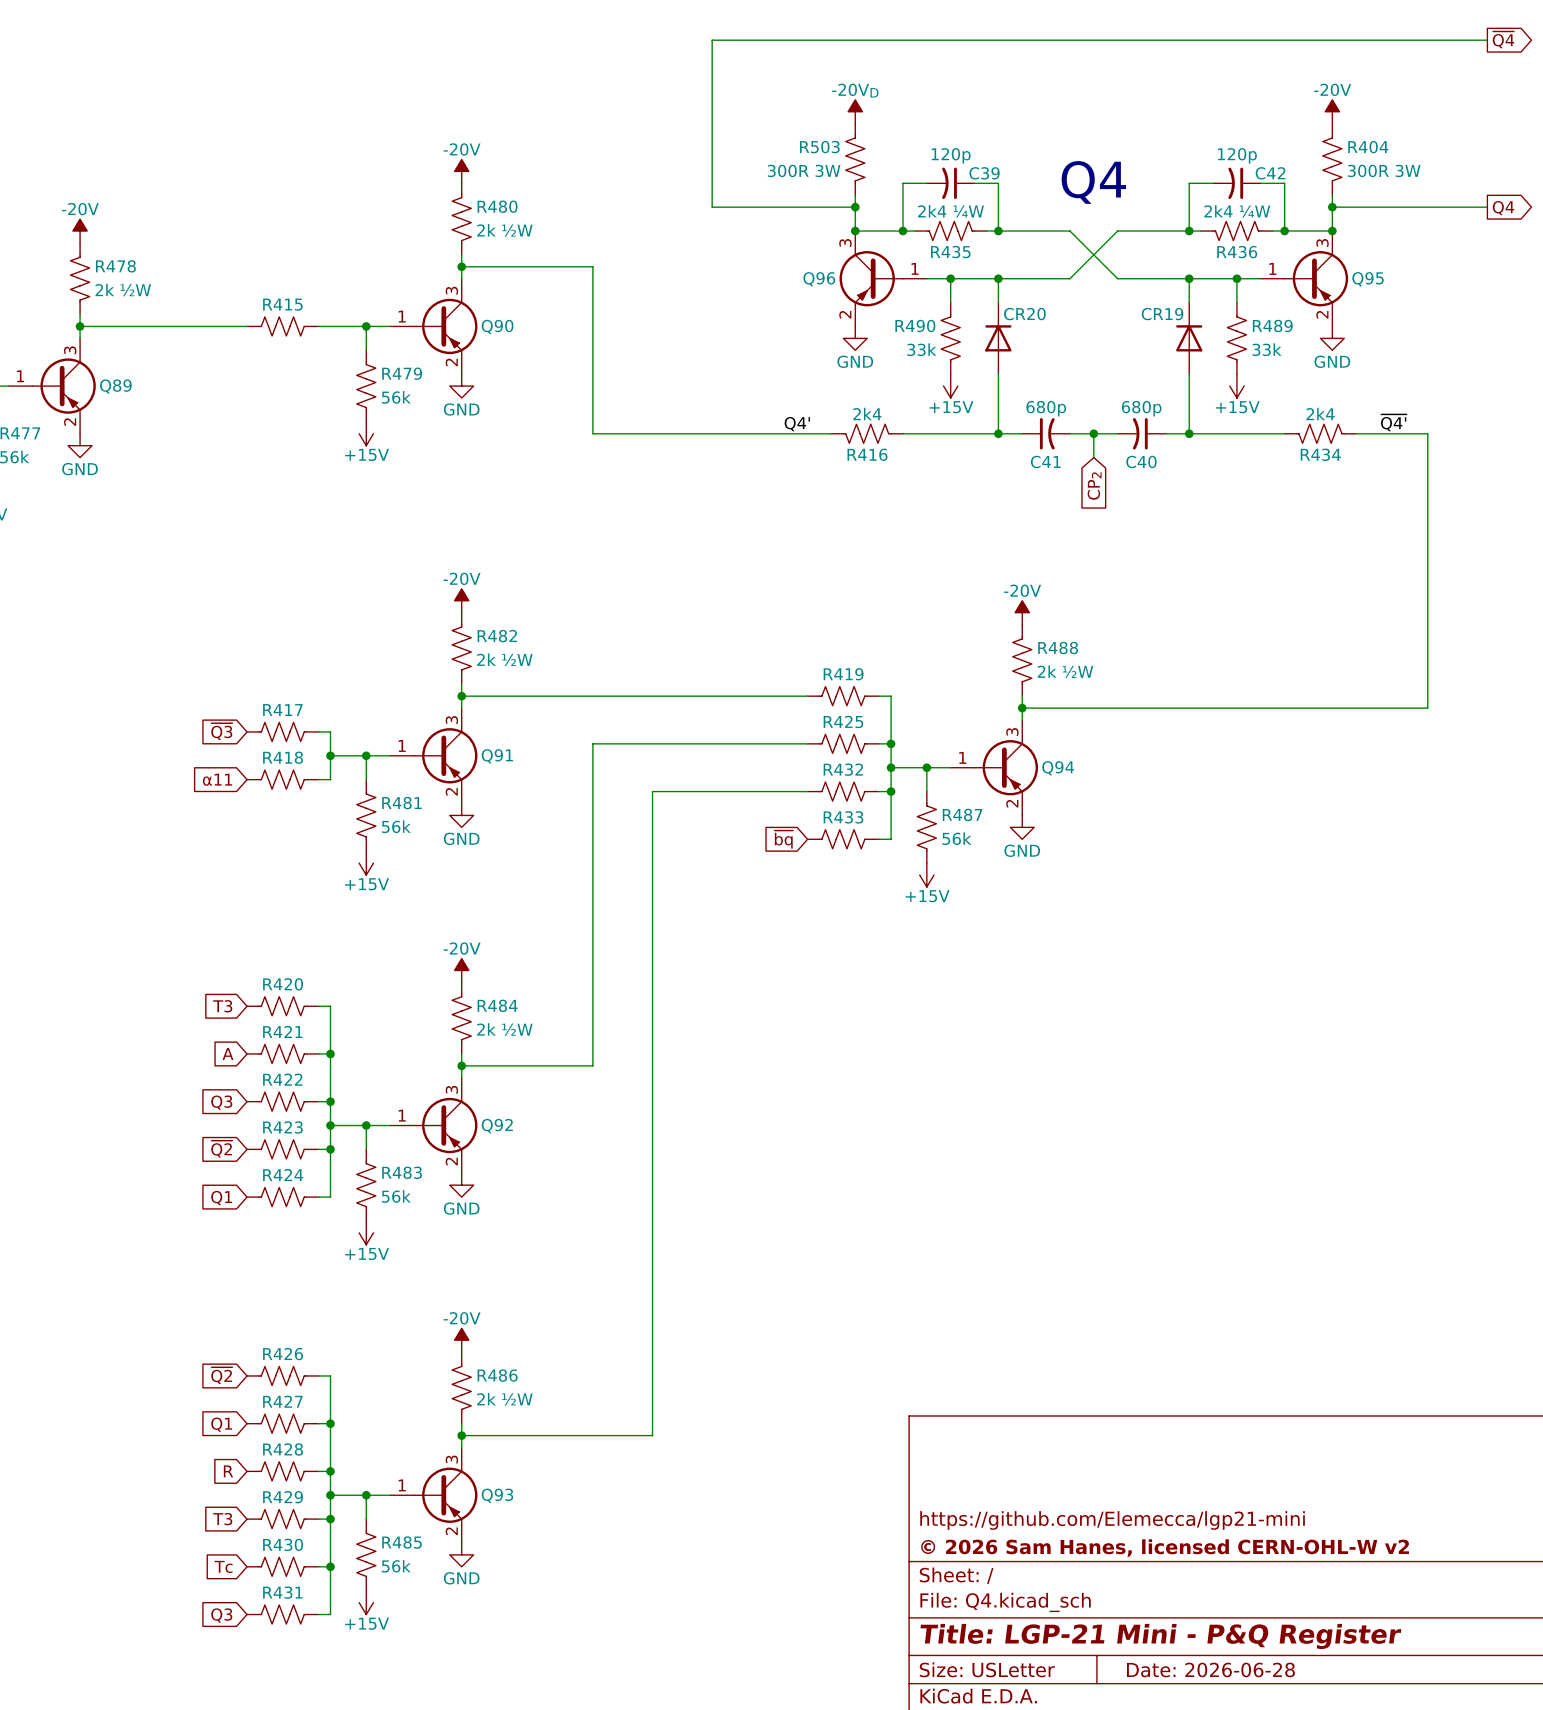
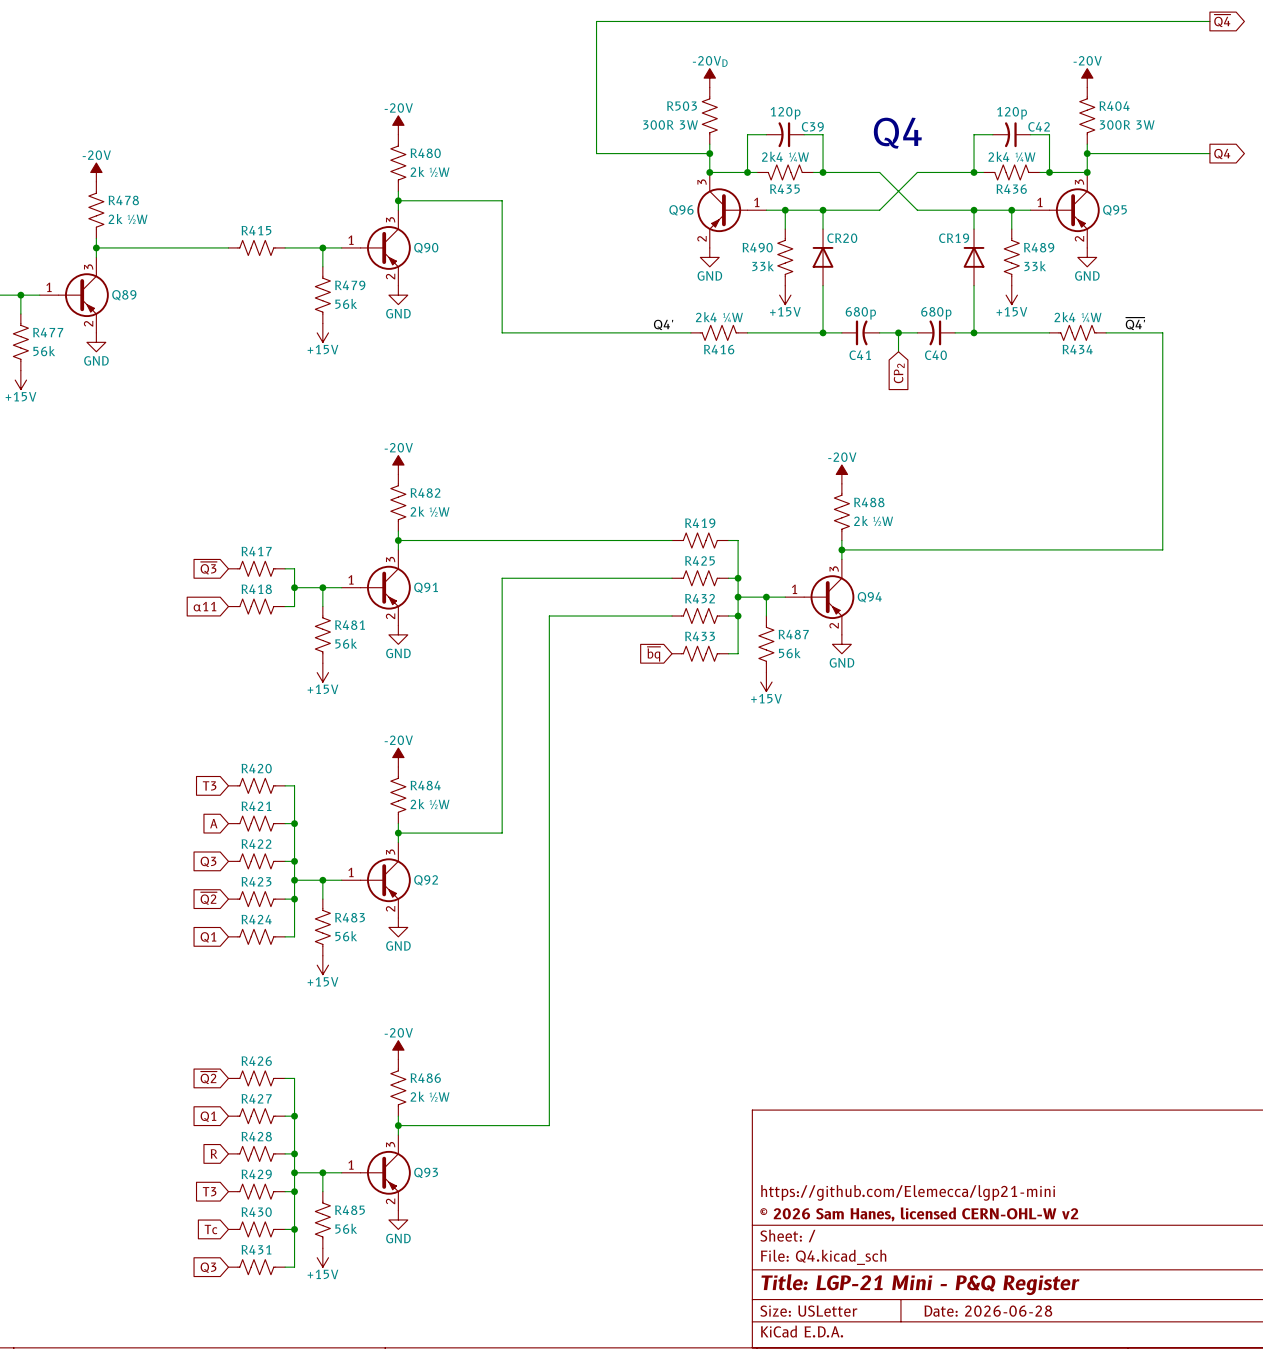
R416 value: 2k4 (867, 413) -> 2k4 ¼W (719, 317)
R434 value: 2k4 (1320, 413) -> 2k4 ¼W (1078, 317)

